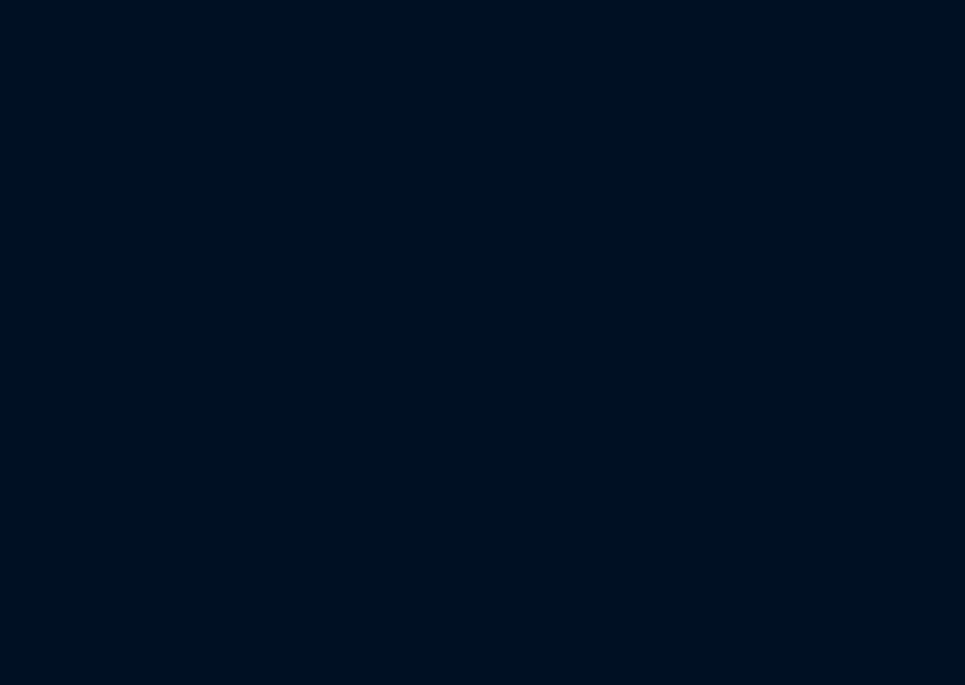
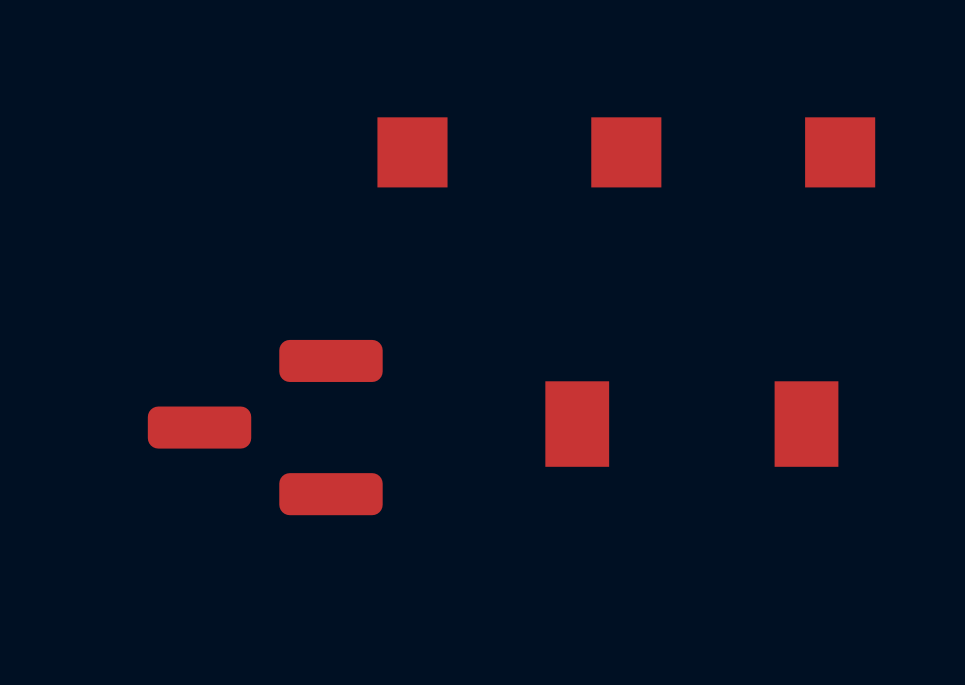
part: none -> (412, 152)
part: none -> (626, 152)
part: none -> (840, 152)
part: none -> (691, 424)
part: none -> (265, 427)

